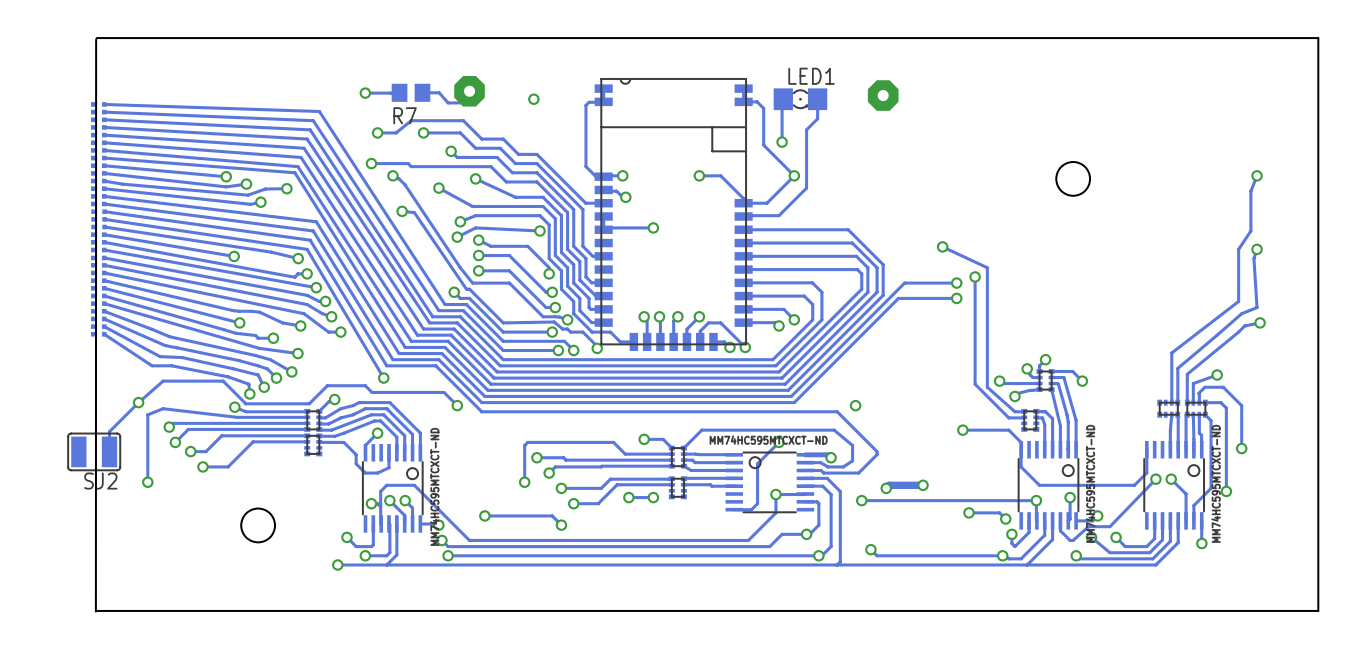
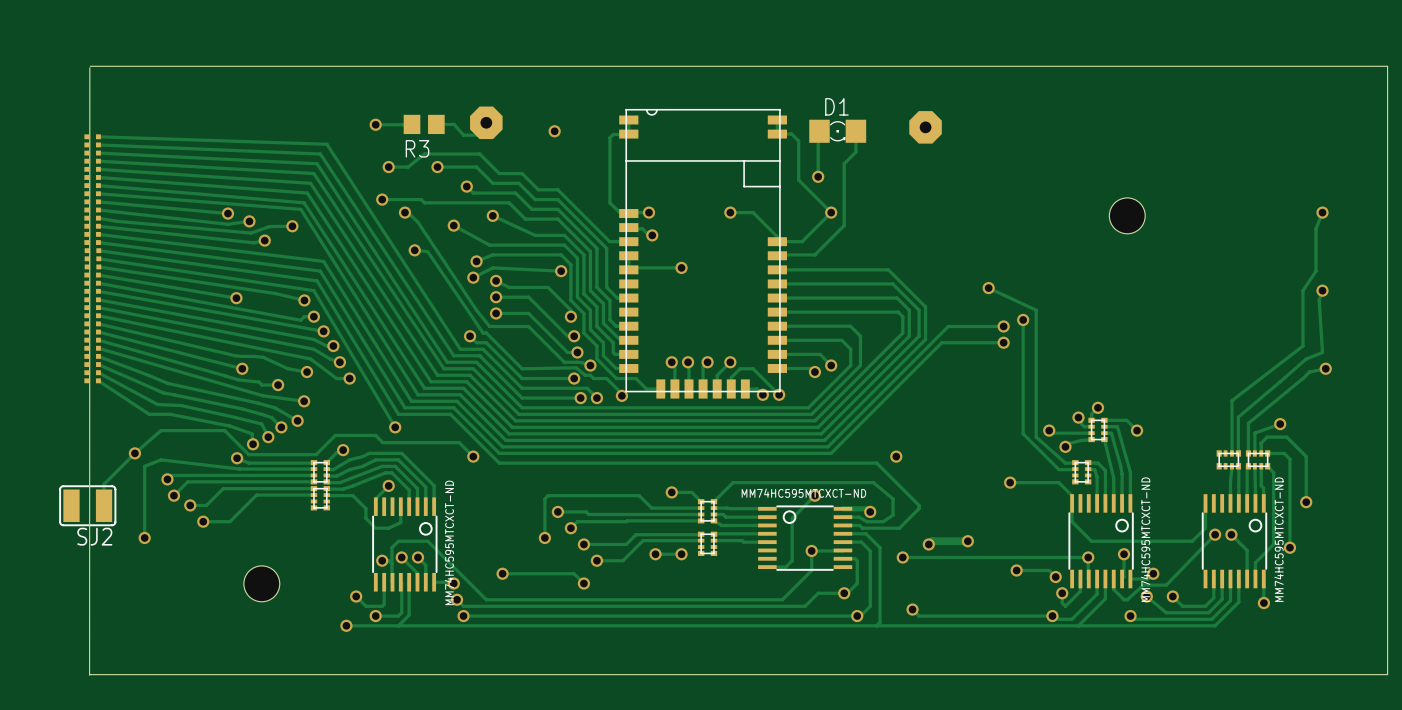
LED1 name: LED1 (811, 76) -> D1 (836, 106)
R7 name: R7 (405, 115) -> R3 (417, 148)

